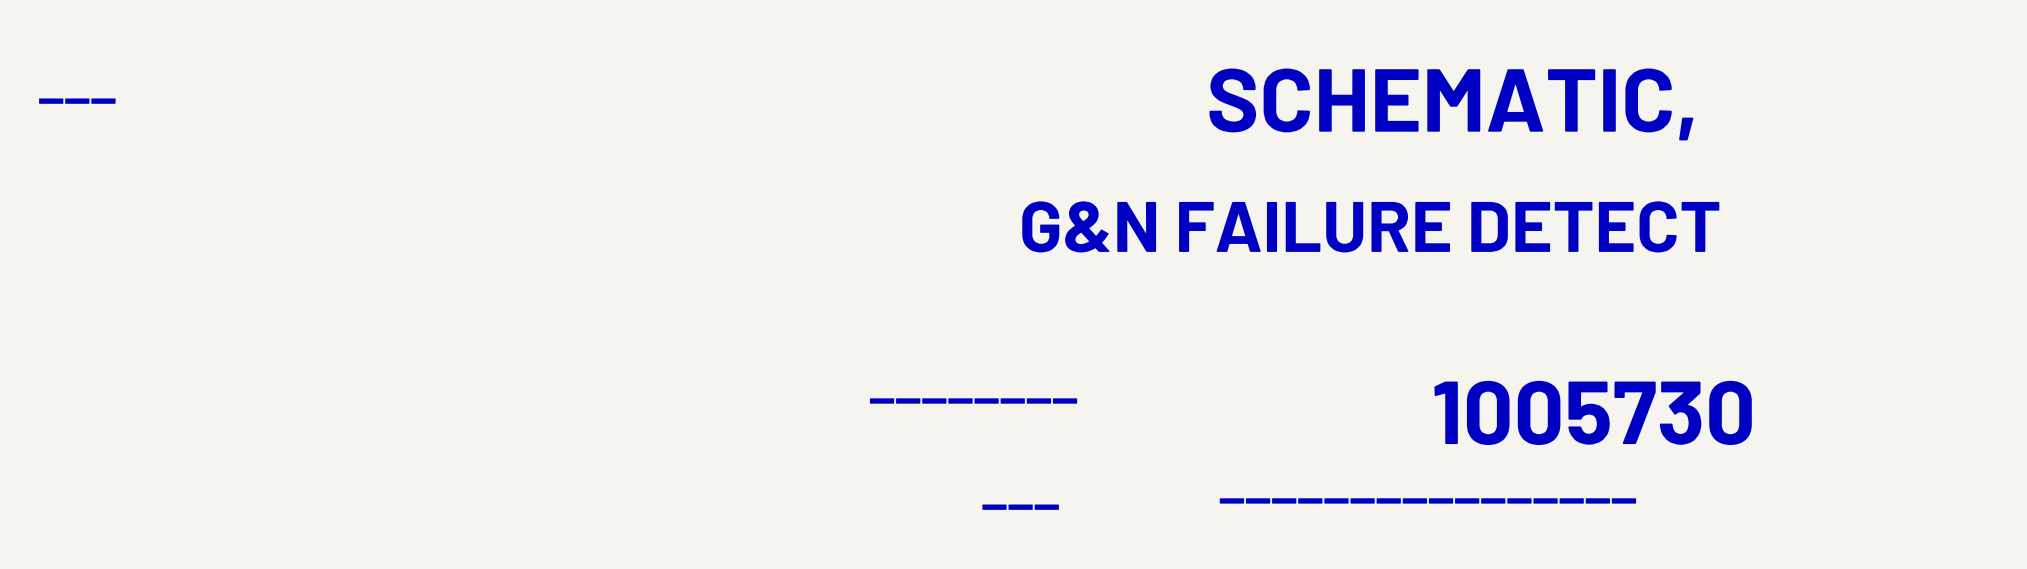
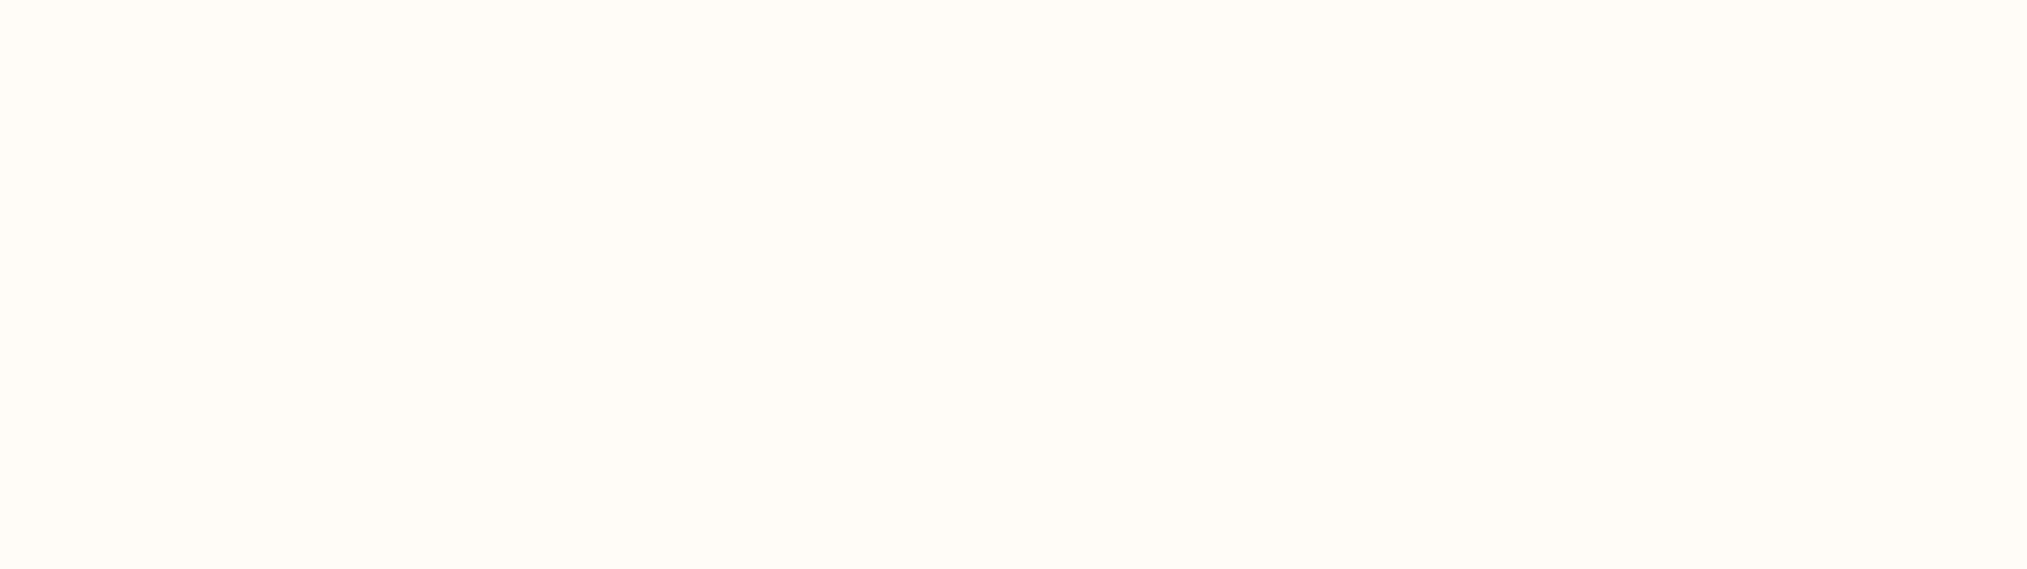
text: ___ (77, 101) -> none
text: SCHEMATIC, (1451, 104) -> none
text: G&N FAILURE DETECT (1370, 226) -> none
text: ________ (973, 401) -> none
text: 1005730 (1593, 412) -> none
text: ________________ (1427, 500) -> none
text: ___ (1020, 507) -> none

